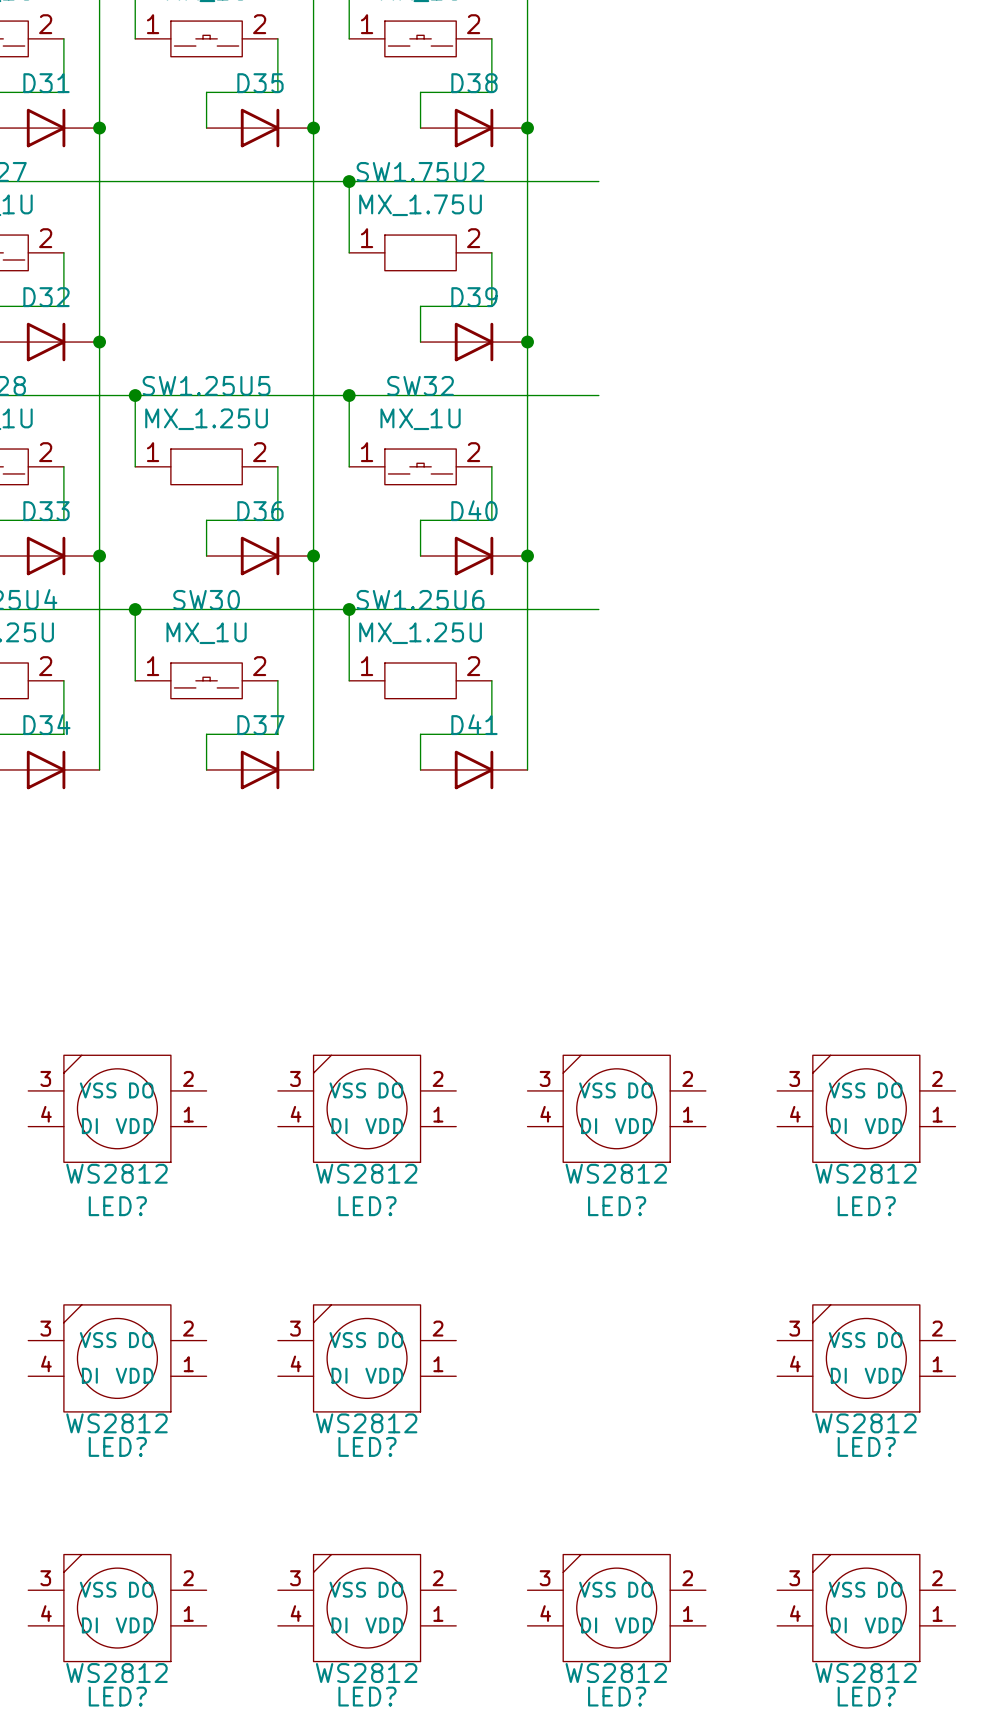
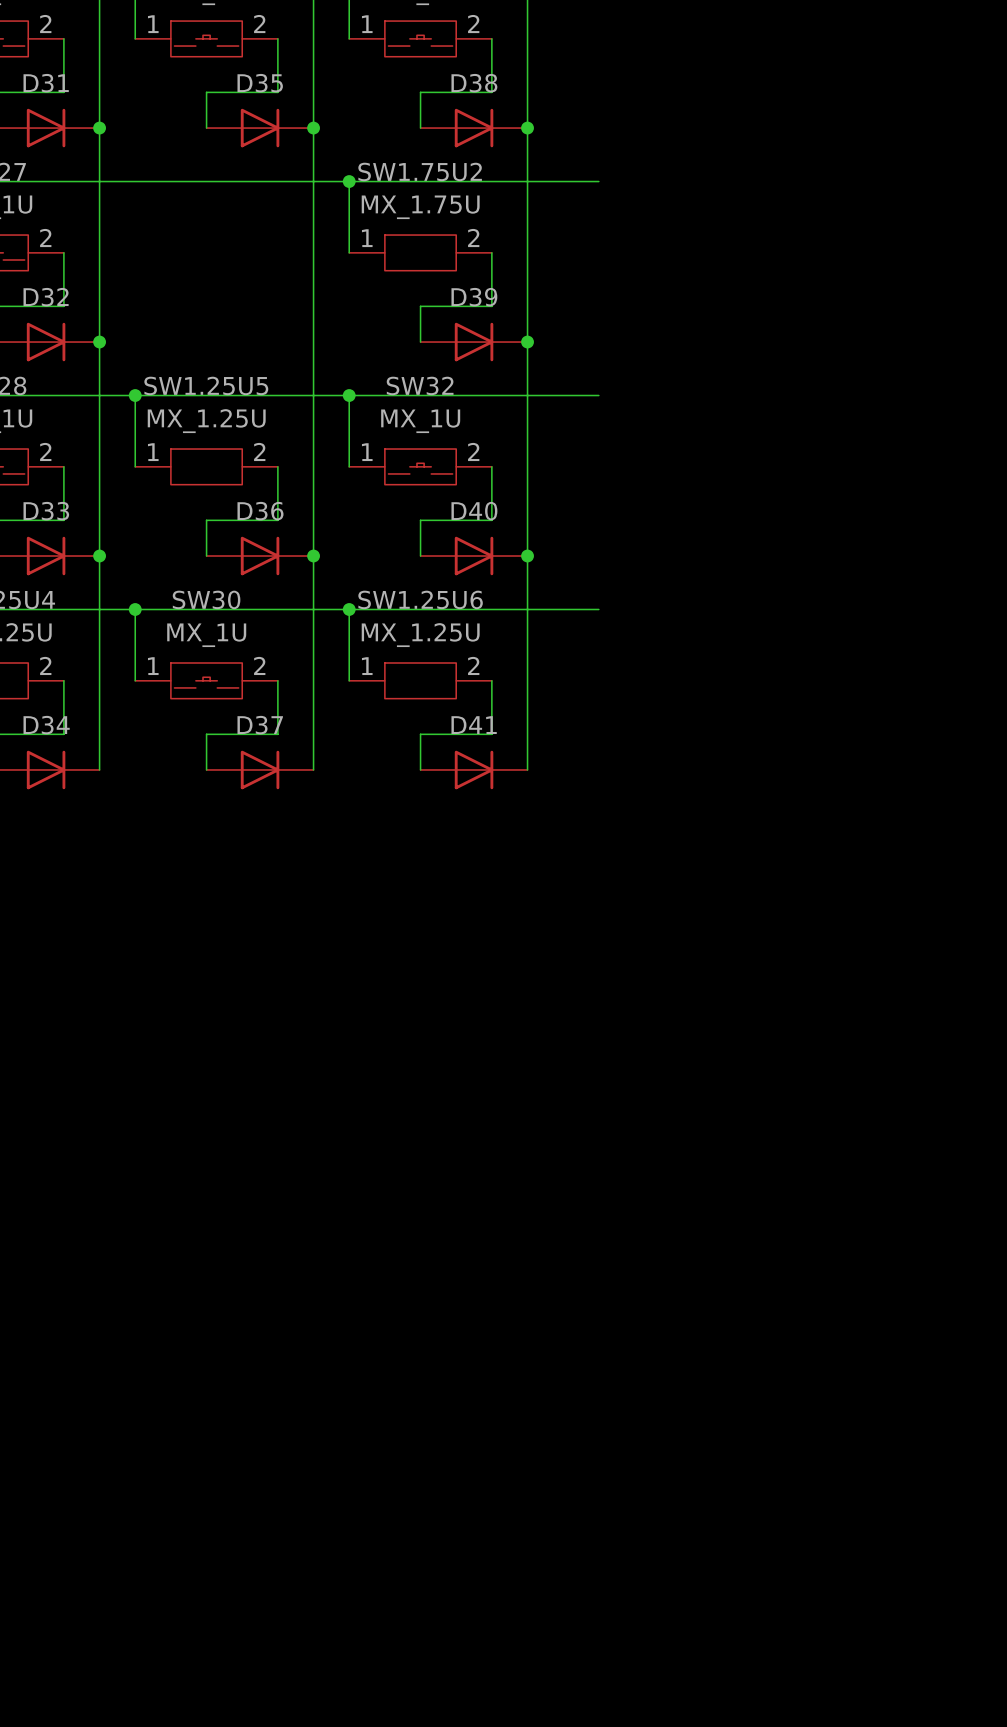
LED?: WS2812 (117, 1108) -> none
LED?: WS2812 (367, 1108) -> none
LED?: WS2812 (616, 1108) -> none
LED?: WS2812 (866, 1108) -> none
LED?: WS2812 (117, 1358) -> none
LED?: WS2812 (367, 1358) -> none
LED?: WS2812 (866, 1358) -> none
LED?: WS2812 (117, 1608) -> none
LED?: WS2812 (367, 1608) -> none
LED?: WS2812 (616, 1608) -> none
LED?: WS2812 (866, 1608) -> none

